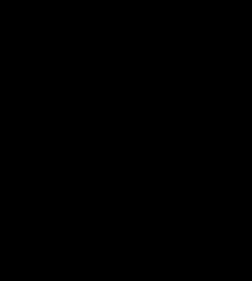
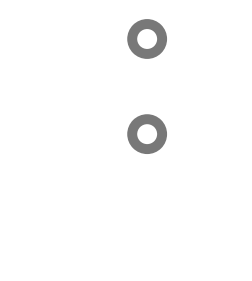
via: none -> (147, 38)
via: none -> (147, 134)

